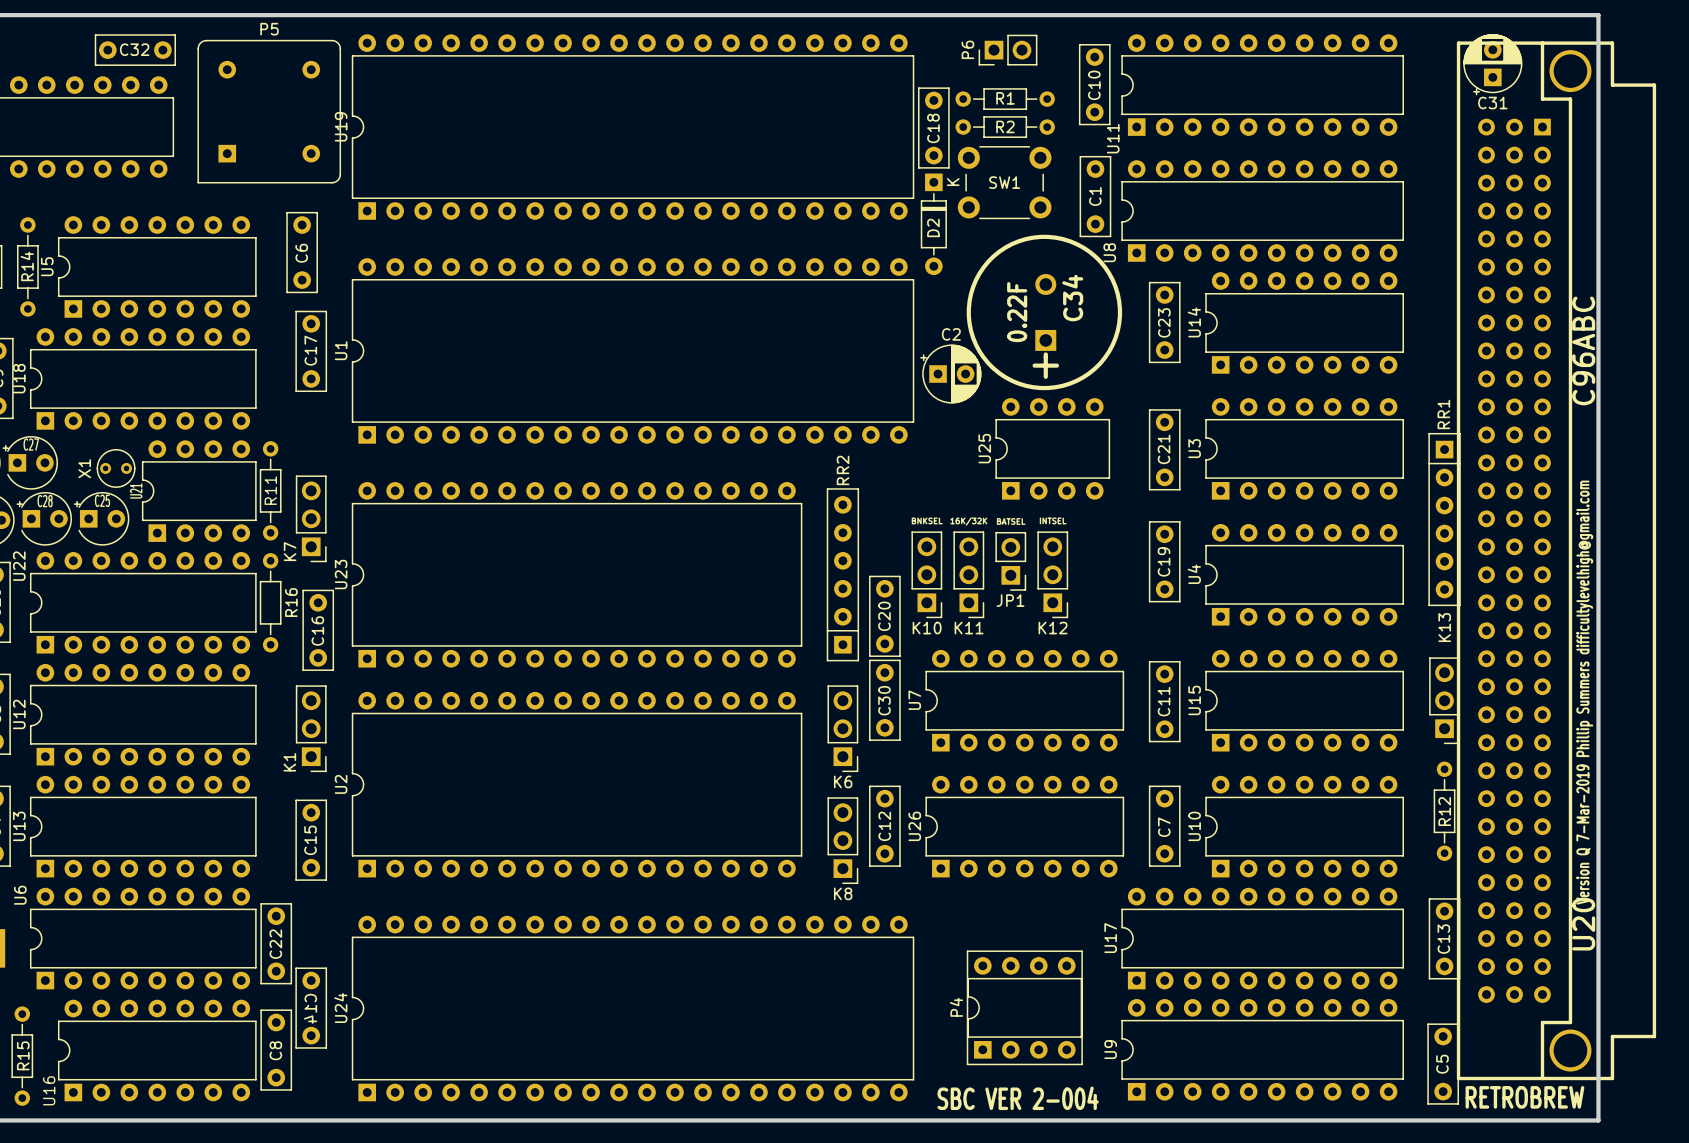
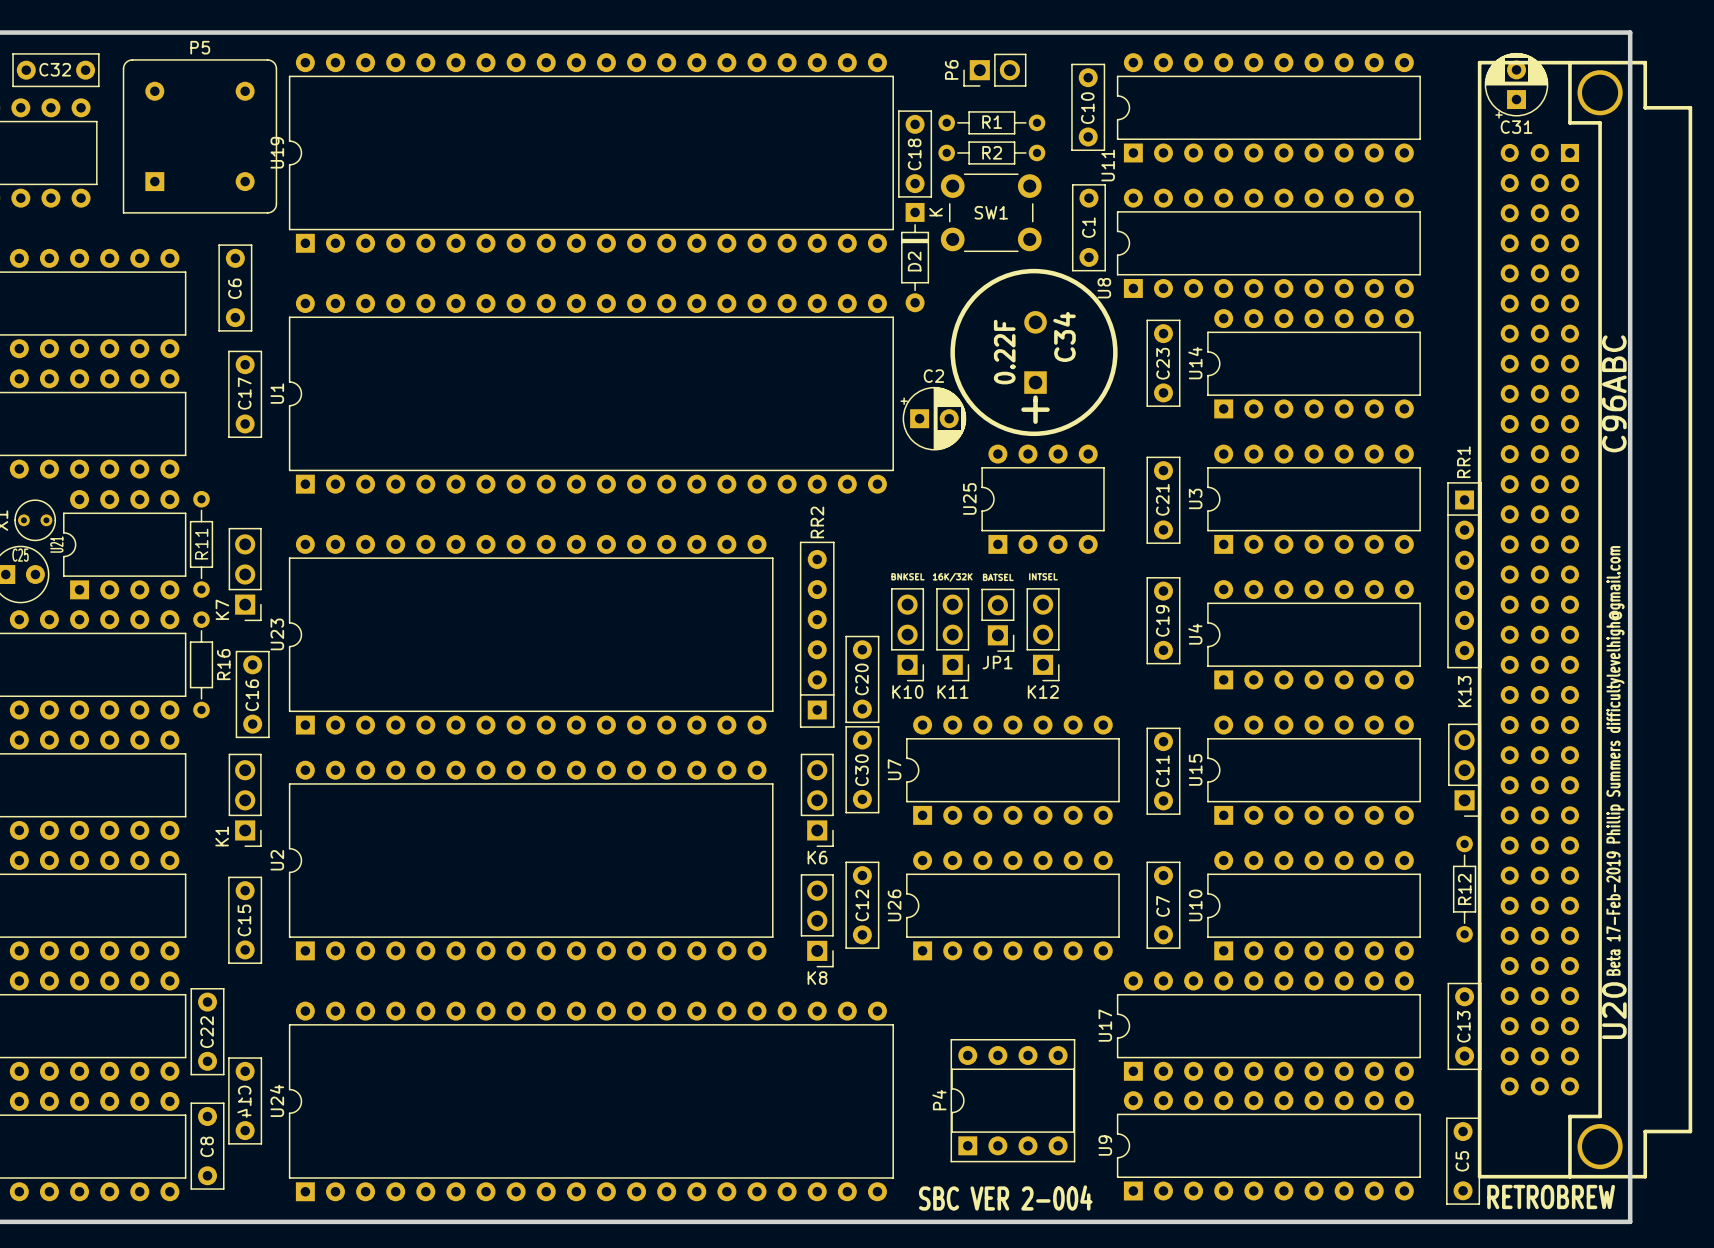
text: Version Q 7-Mar-2019 Phillip Summers difficultylevelhigh@gmail.com (1584, 692) -> Beta 17-Feb-2019 Phillip Summers difficultylevelhigh@gmail.com (1615, 760)

